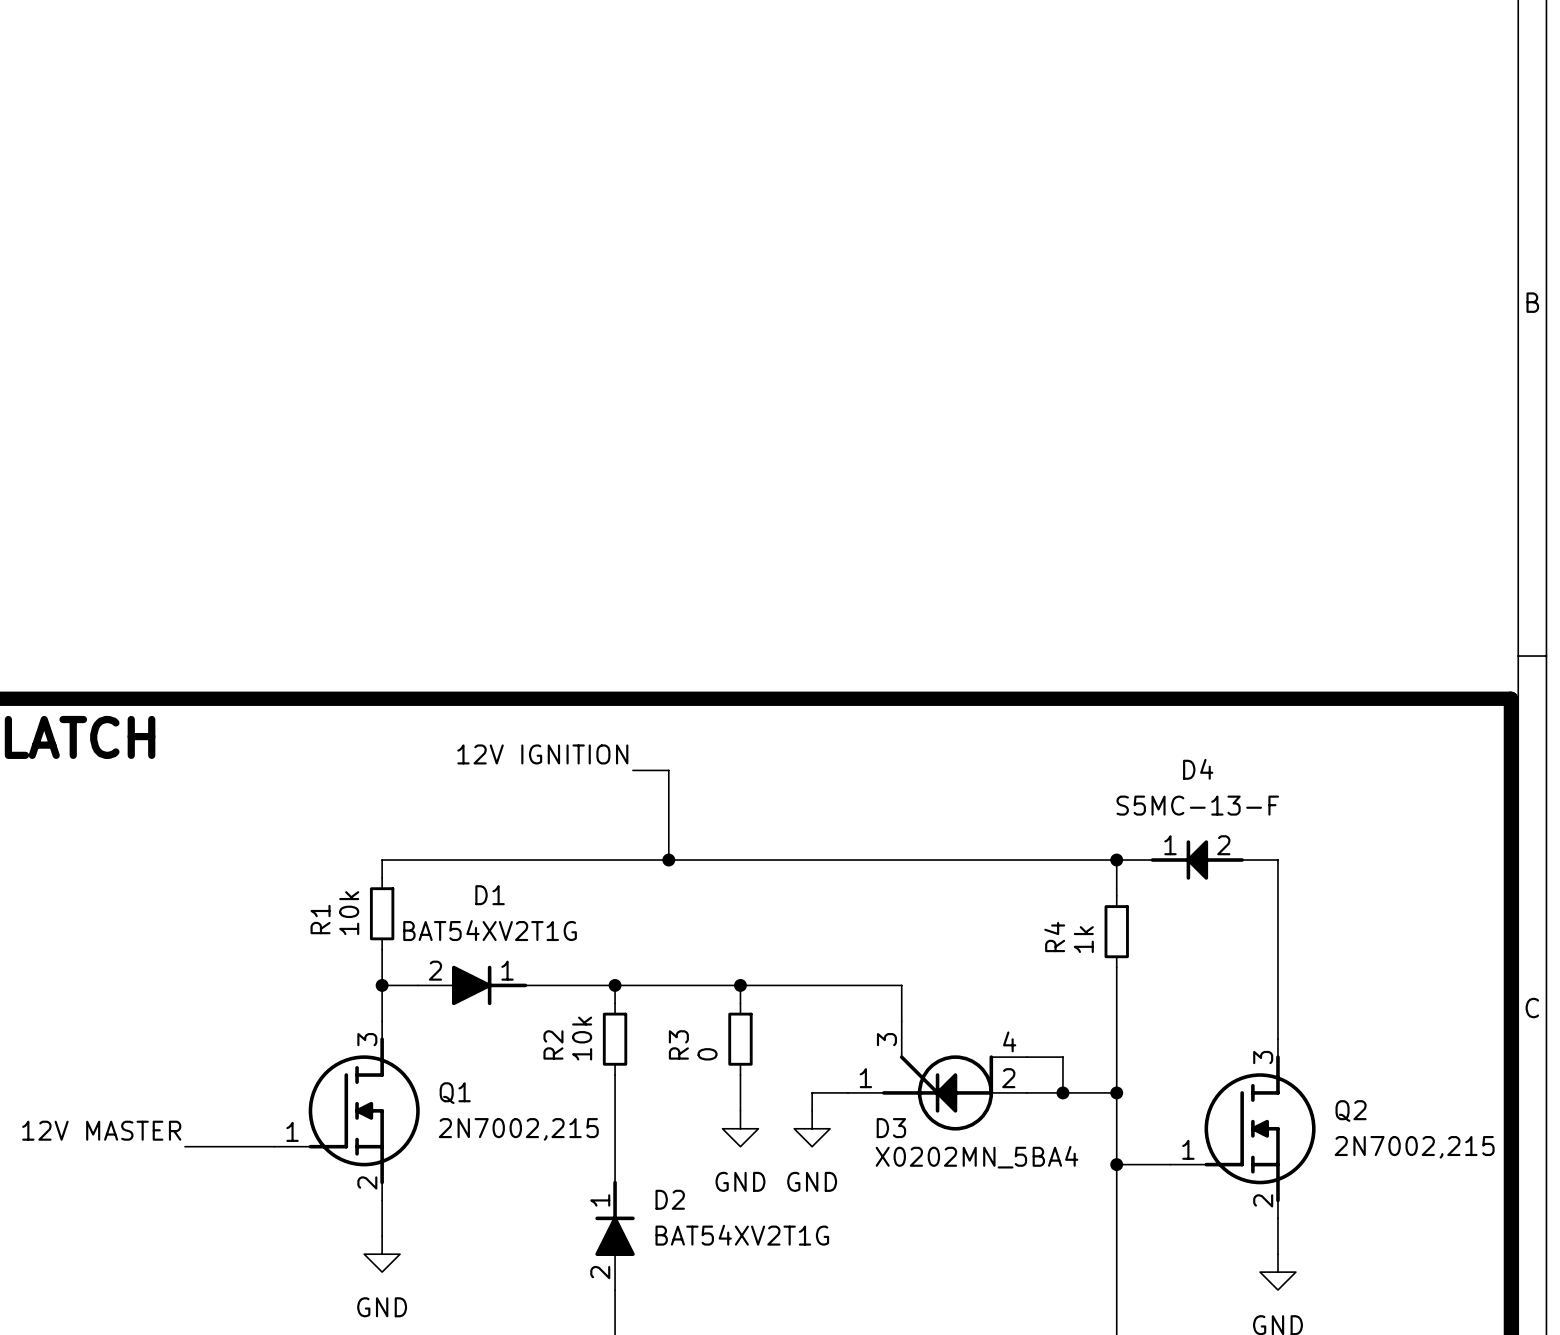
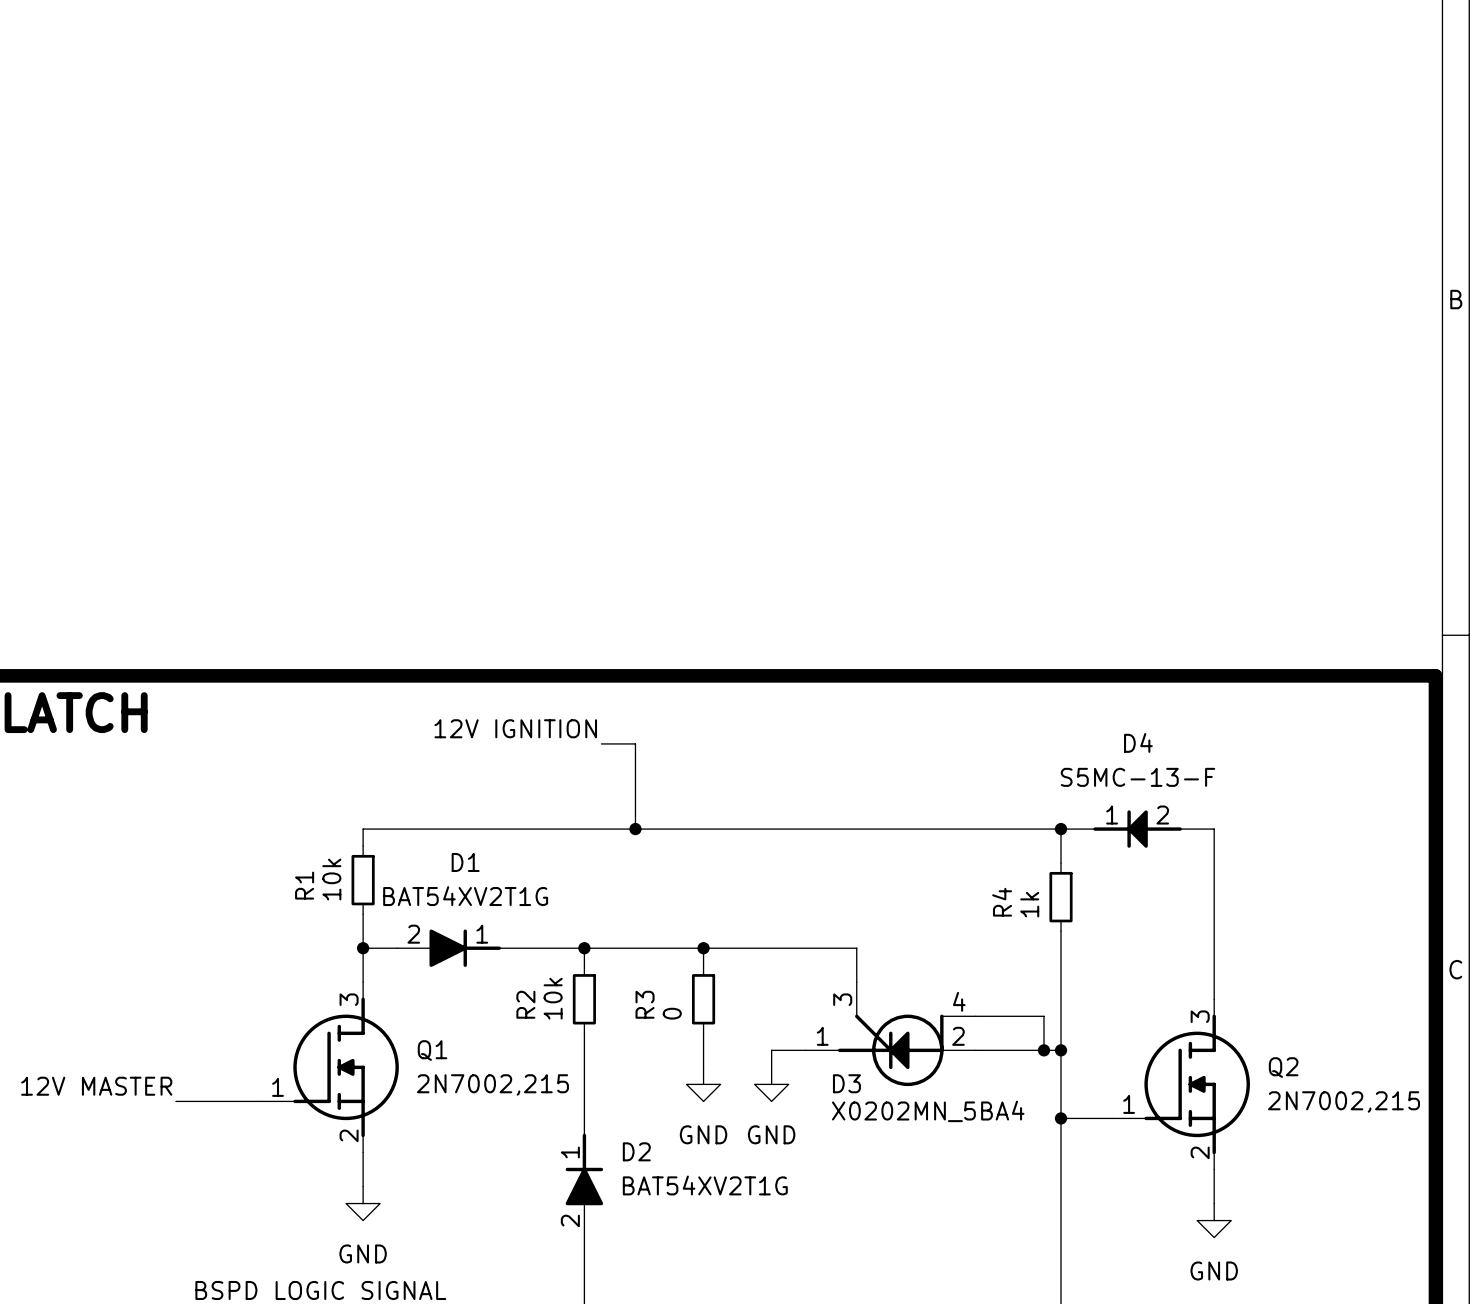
wire: (1062, 1057) (1062, 1092) -> (1009, 1016) (1043, 1016) (1043, 1050)
junction position: (1062, 1092) -> (1043, 1050)

